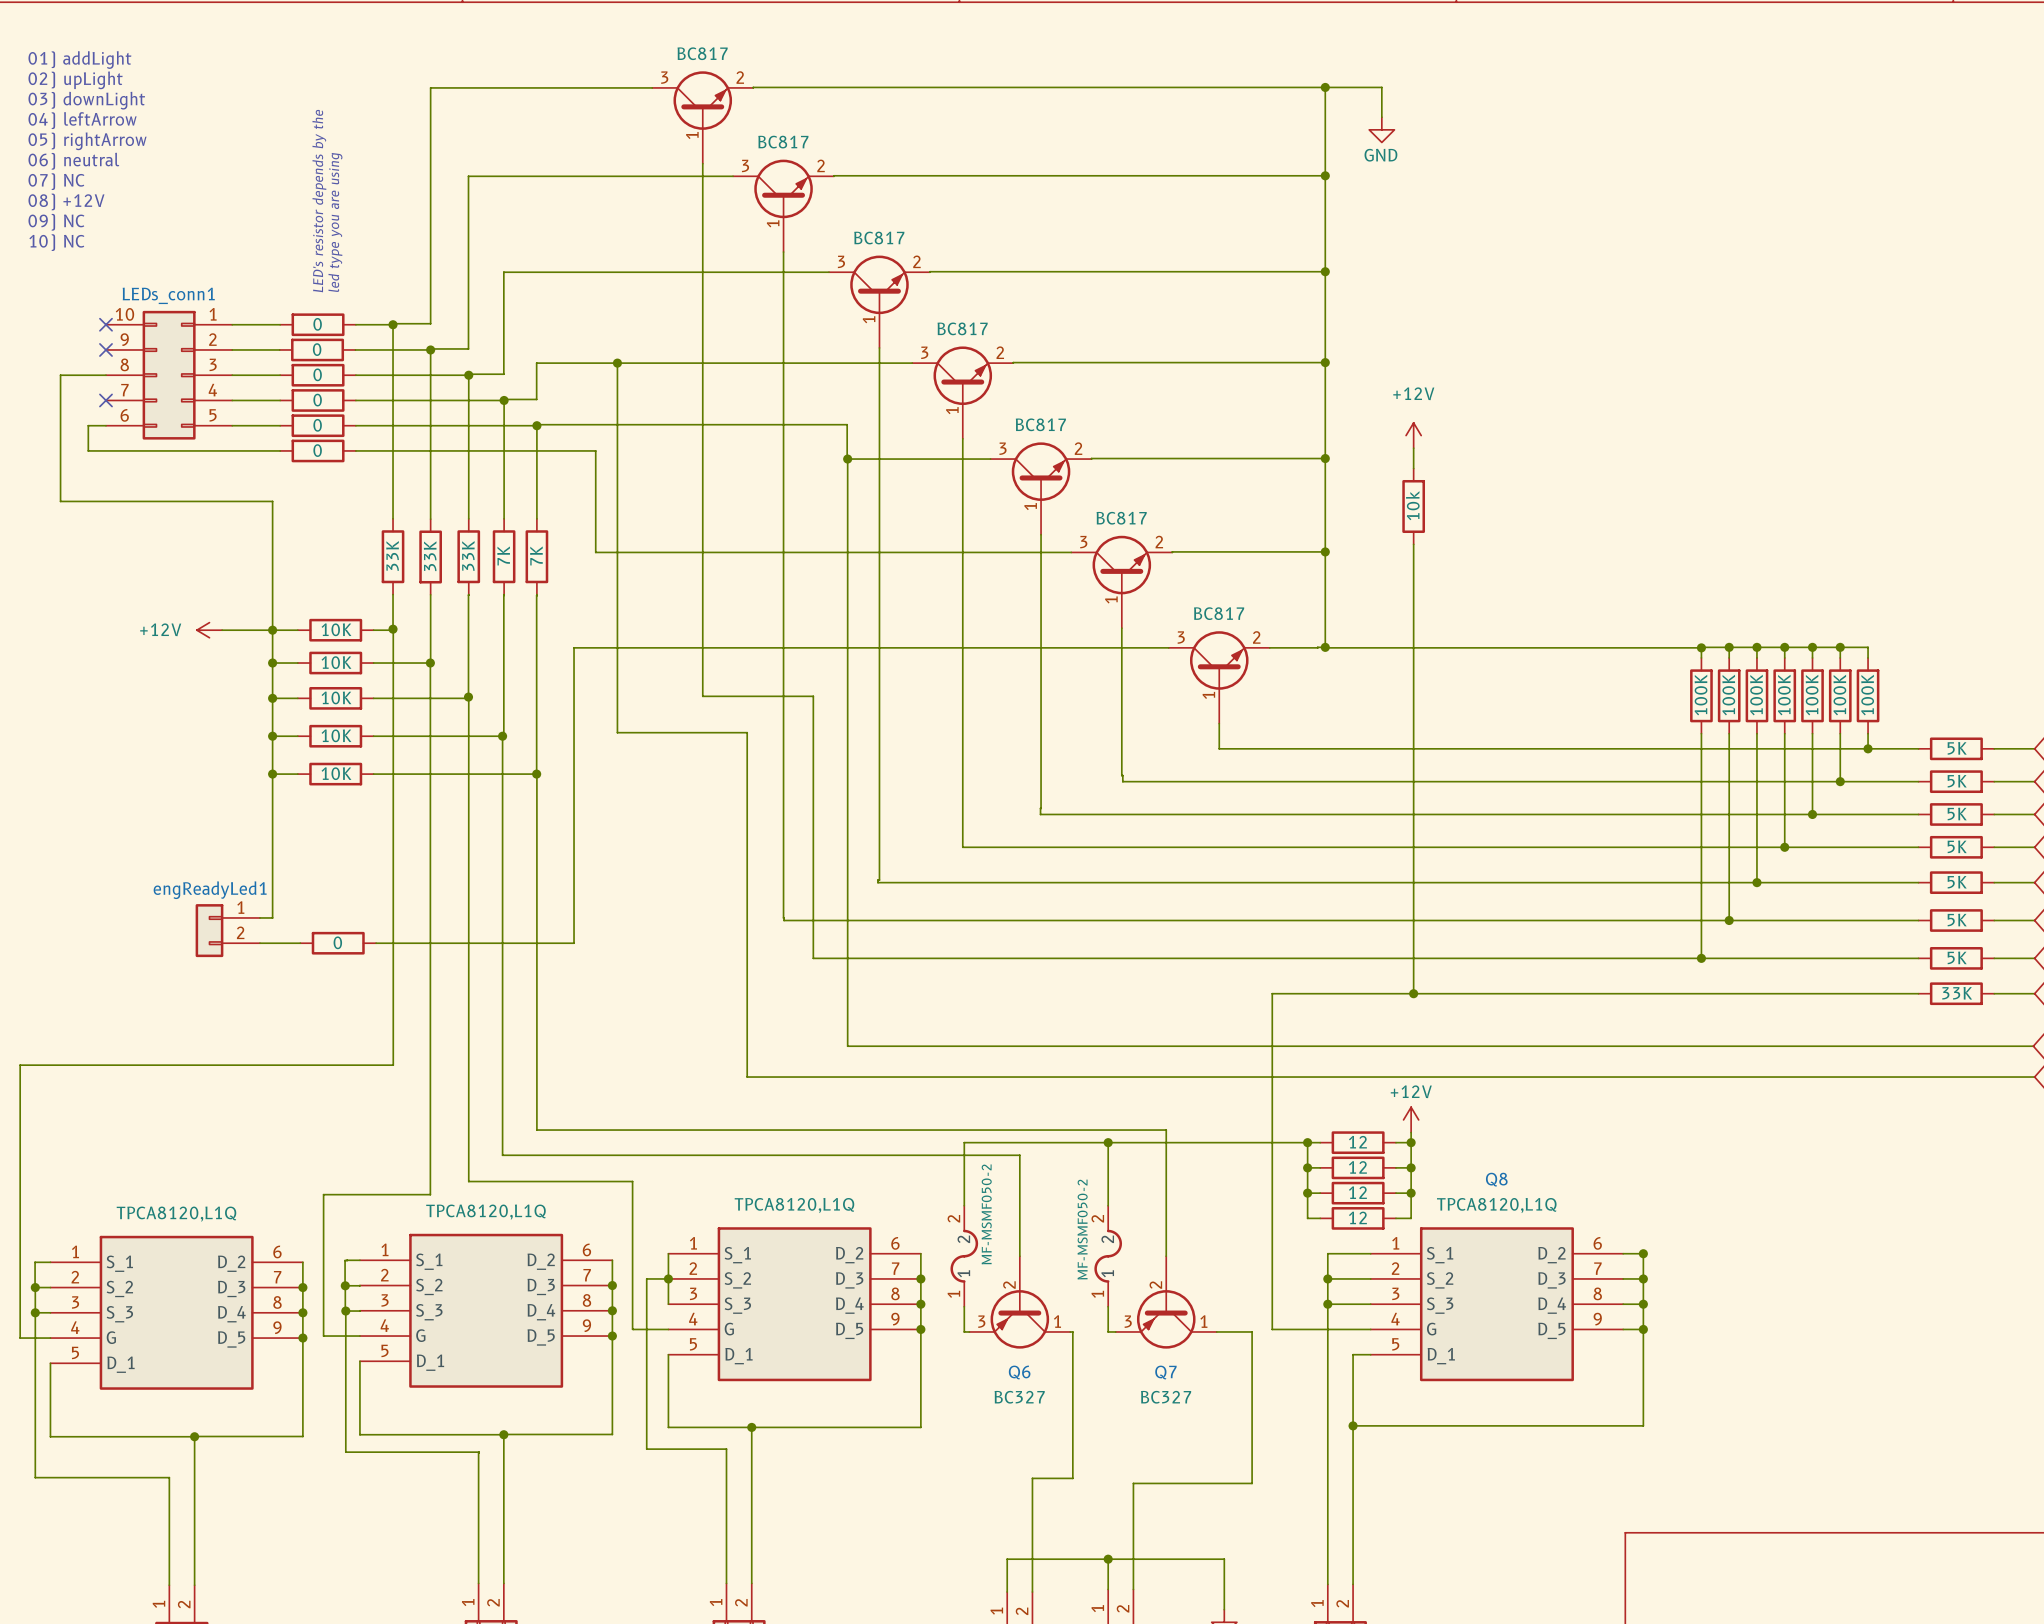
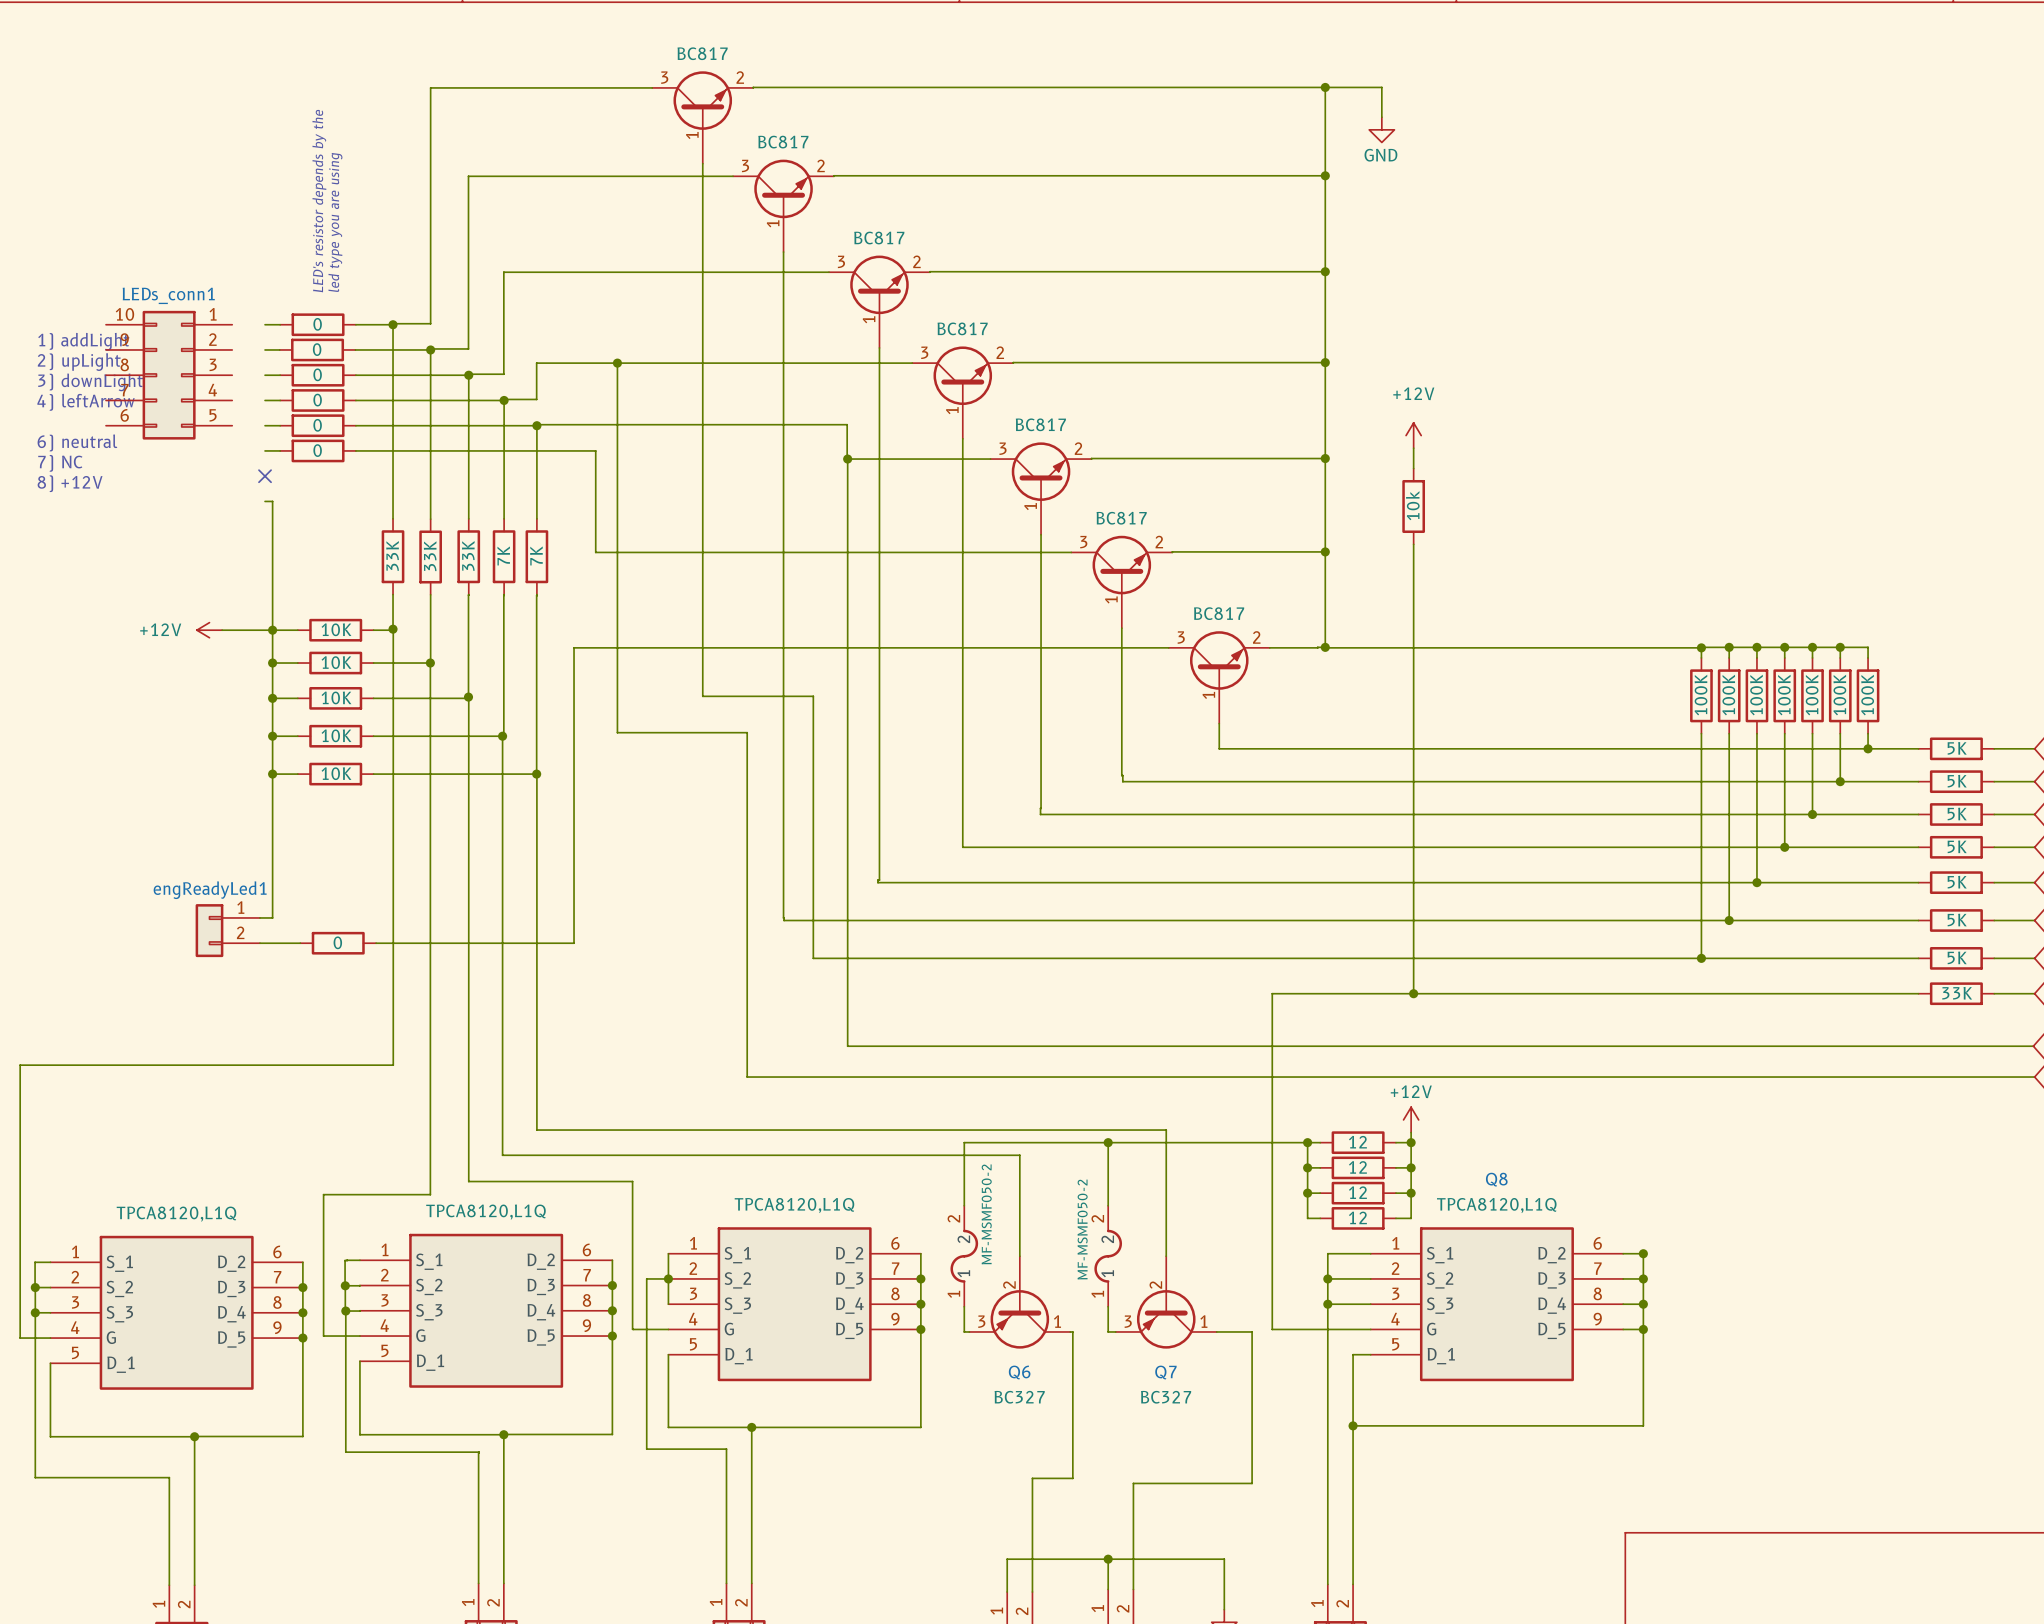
text: 01) addLight (79, 60) -> none
text: 02) upLight (75, 80) -> none
text: 03) downLight (86, 100) -> none
text: 04) leftArrow (82, 120) -> none
text: 05) rightArrow (87, 141) -> none
text: 06) neutral (73, 161) -> none
text: 07) NC (56, 181) -> none
text: 08) +12V (66, 201) -> none
text: 09) NC (56, 222) -> none
text: 10) NC (56, 242) -> none
no-connect mark: (105, 324) -> none
wire: (232, 324) (265, 324) -> none
text: none -> 1) addLight (83, 341)
no-connect mark: (105, 349) -> none
wire: (232, 349) (265, 349) -> none
text: none -> 2) upLight (79, 362)
wire: (105, 375) (60, 375) (60, 501) (265, 501) -> none
wire: (232, 375) (265, 375) -> none
text: none -> 3) downLight (90, 382)
no-connect mark: (105, 400) -> none
wire: (232, 400) (265, 400) -> none
text: none -> 4) leftArrow (86, 402)
wire: (105, 425) (88, 425) (88, 450) (265, 450) -> none
wire: (232, 425) (265, 425) -> none
text: none -> 6) neutral (77, 442)
text: none -> 7) NC (60, 463)
no-connect mark: none -> (265, 476)
text: none -> 8) +12V (70, 483)

